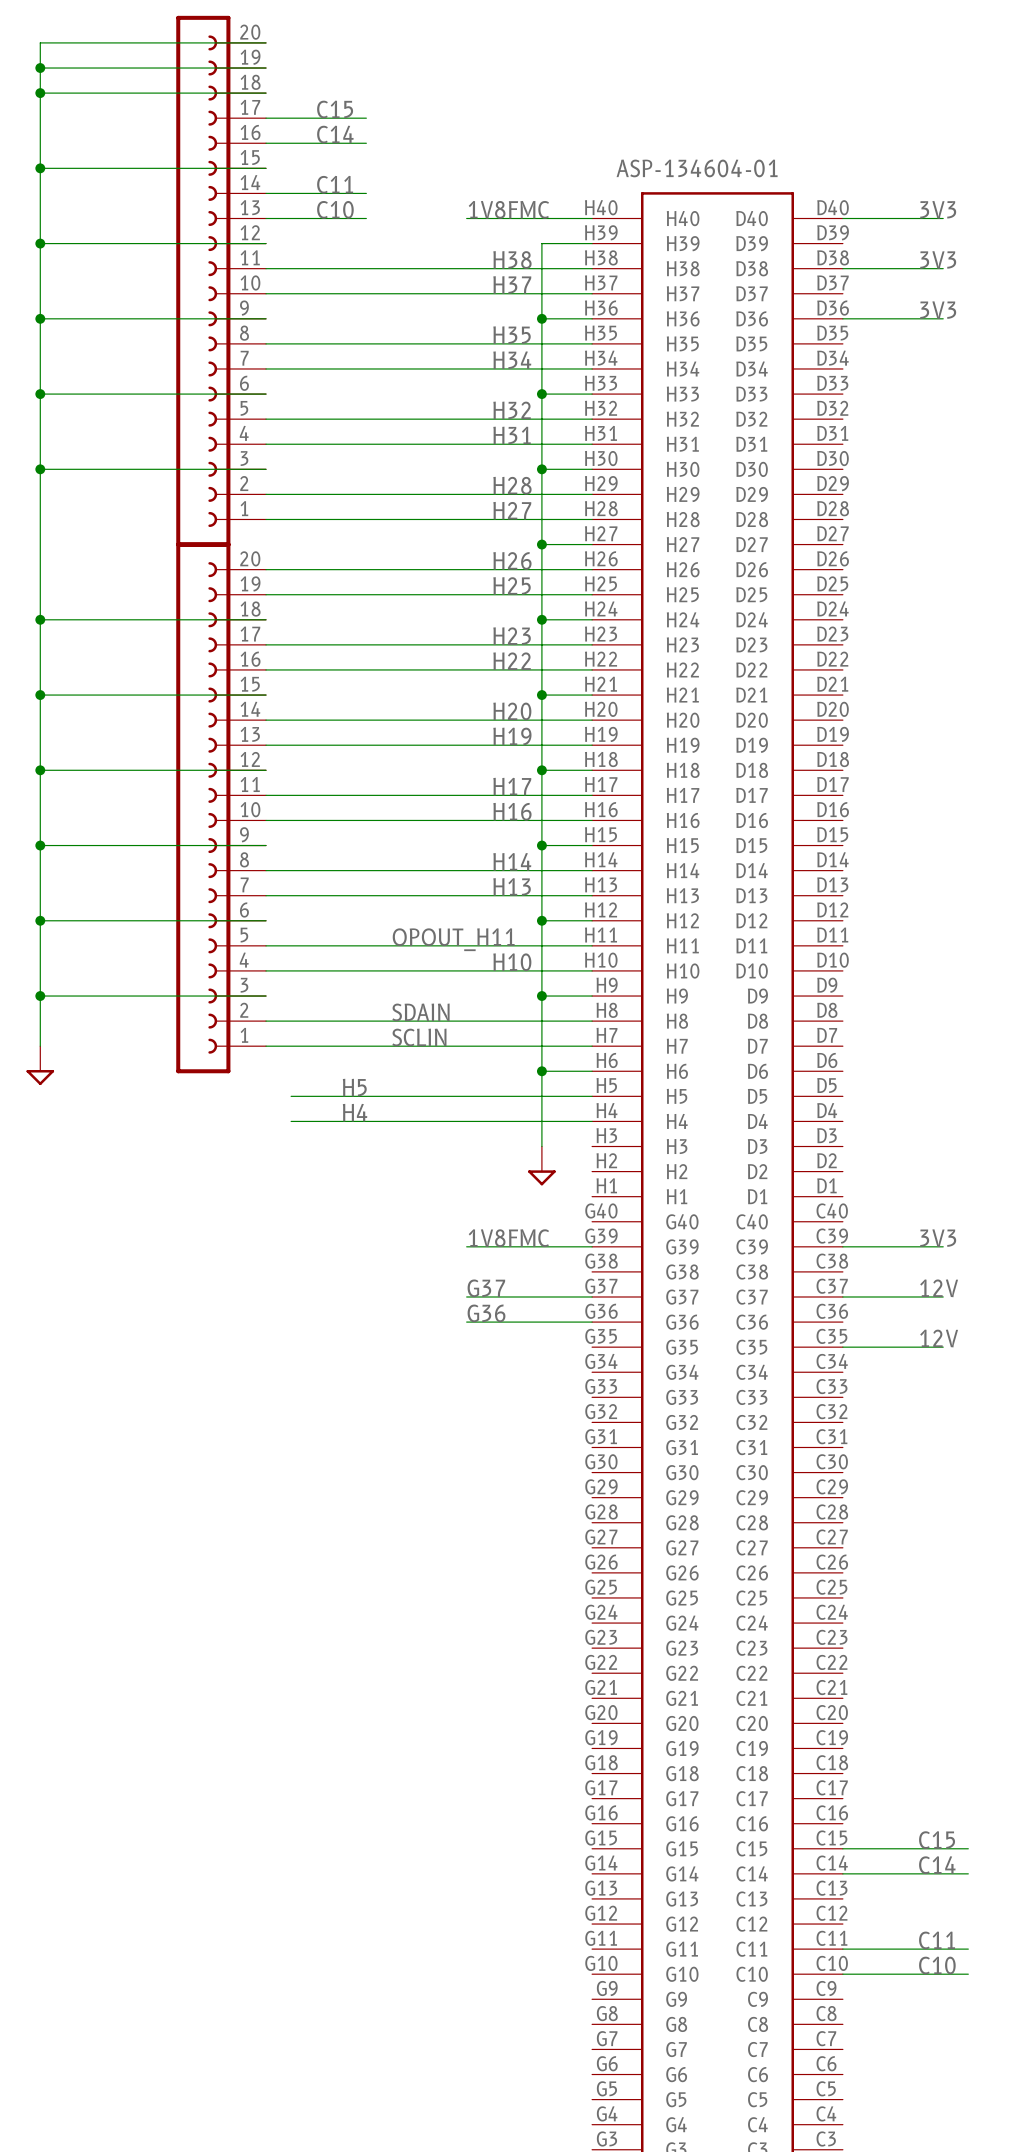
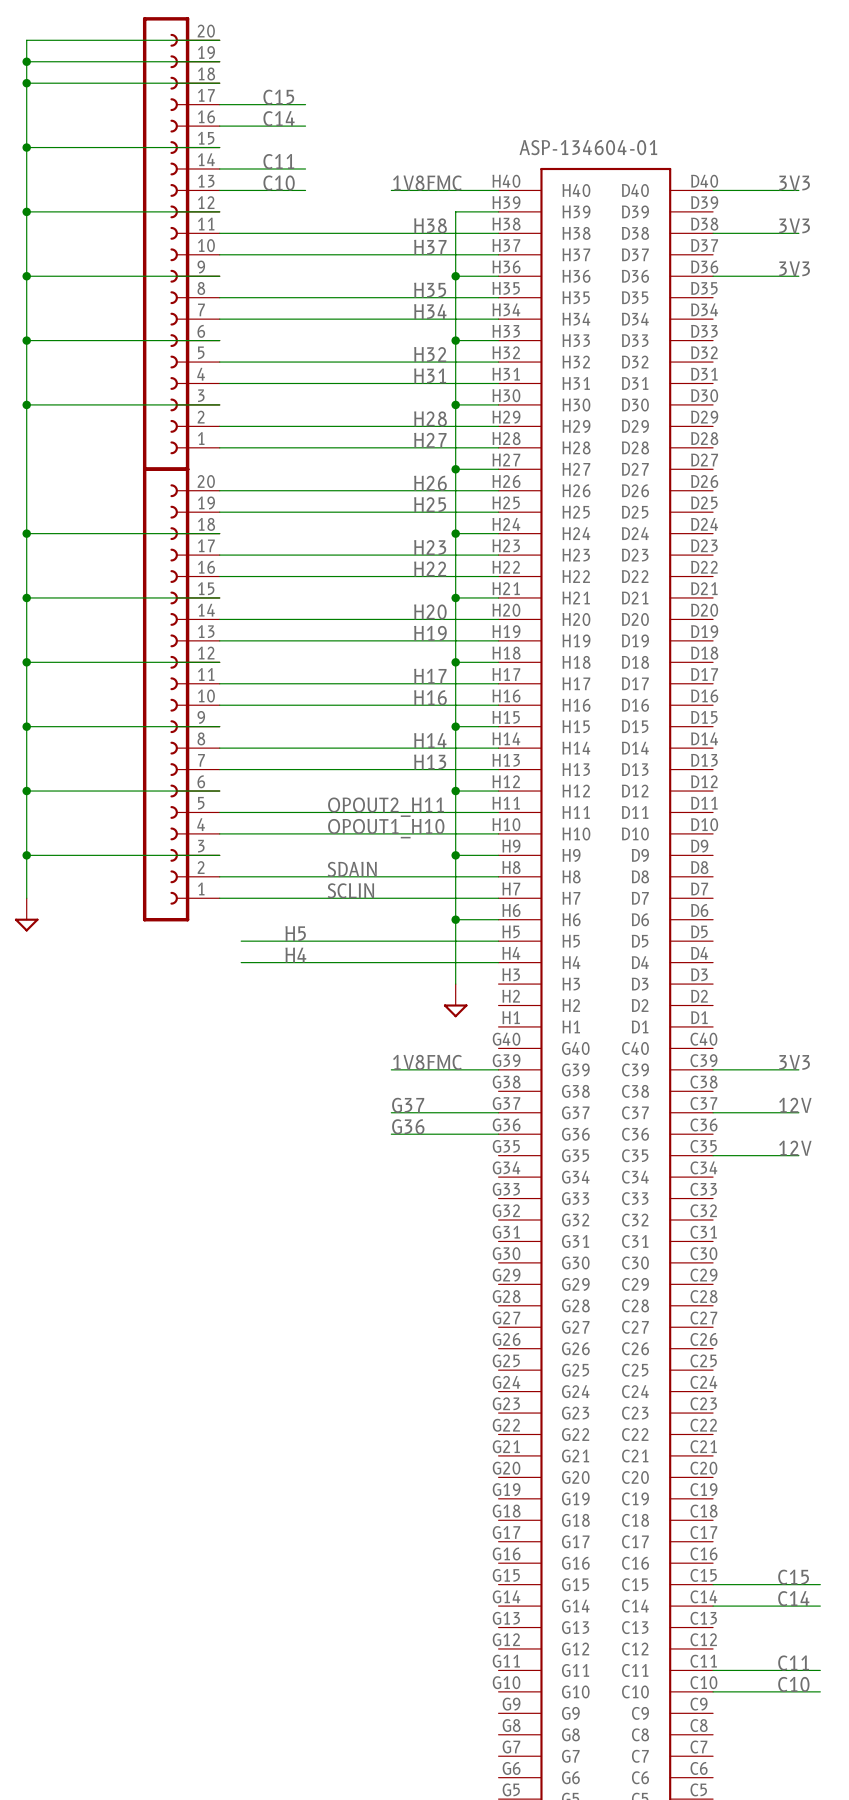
label: OPOUT_H11 (453, 939) -> OPOUT2_H11 (385, 807)
label: H10 (512, 962) -> none
label: none -> OPOUT1_H10 (386, 828)

